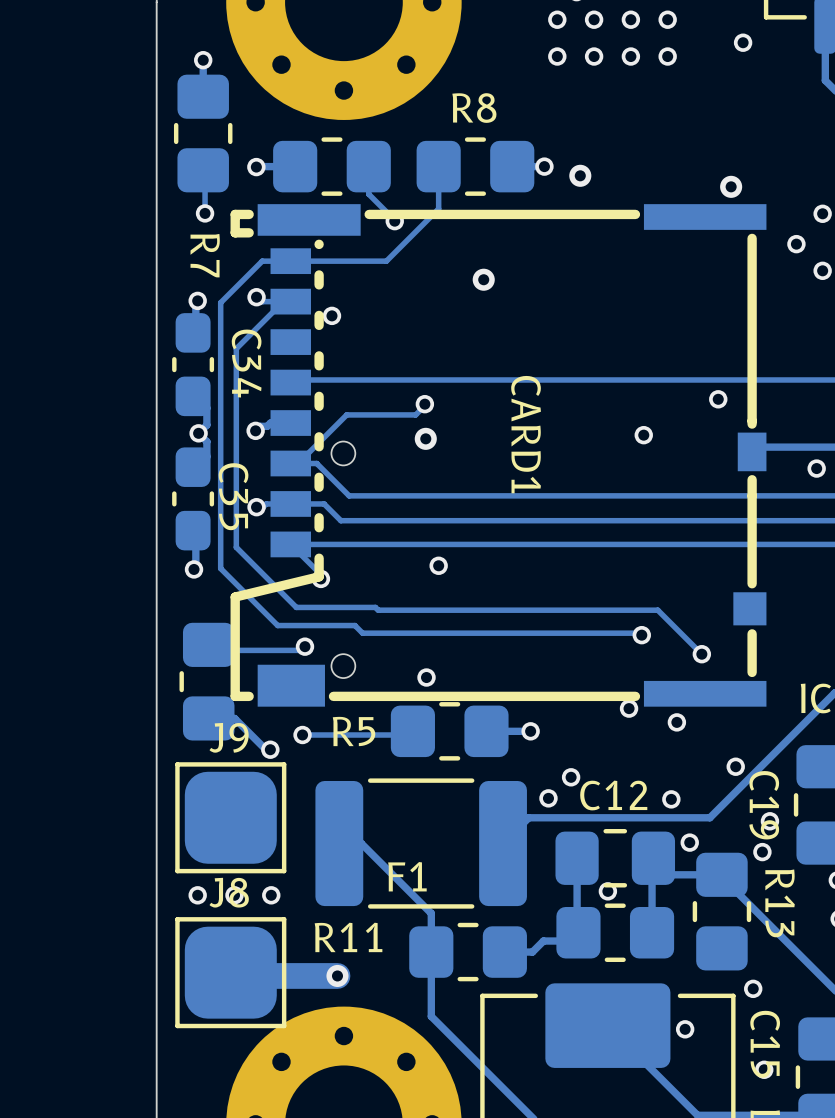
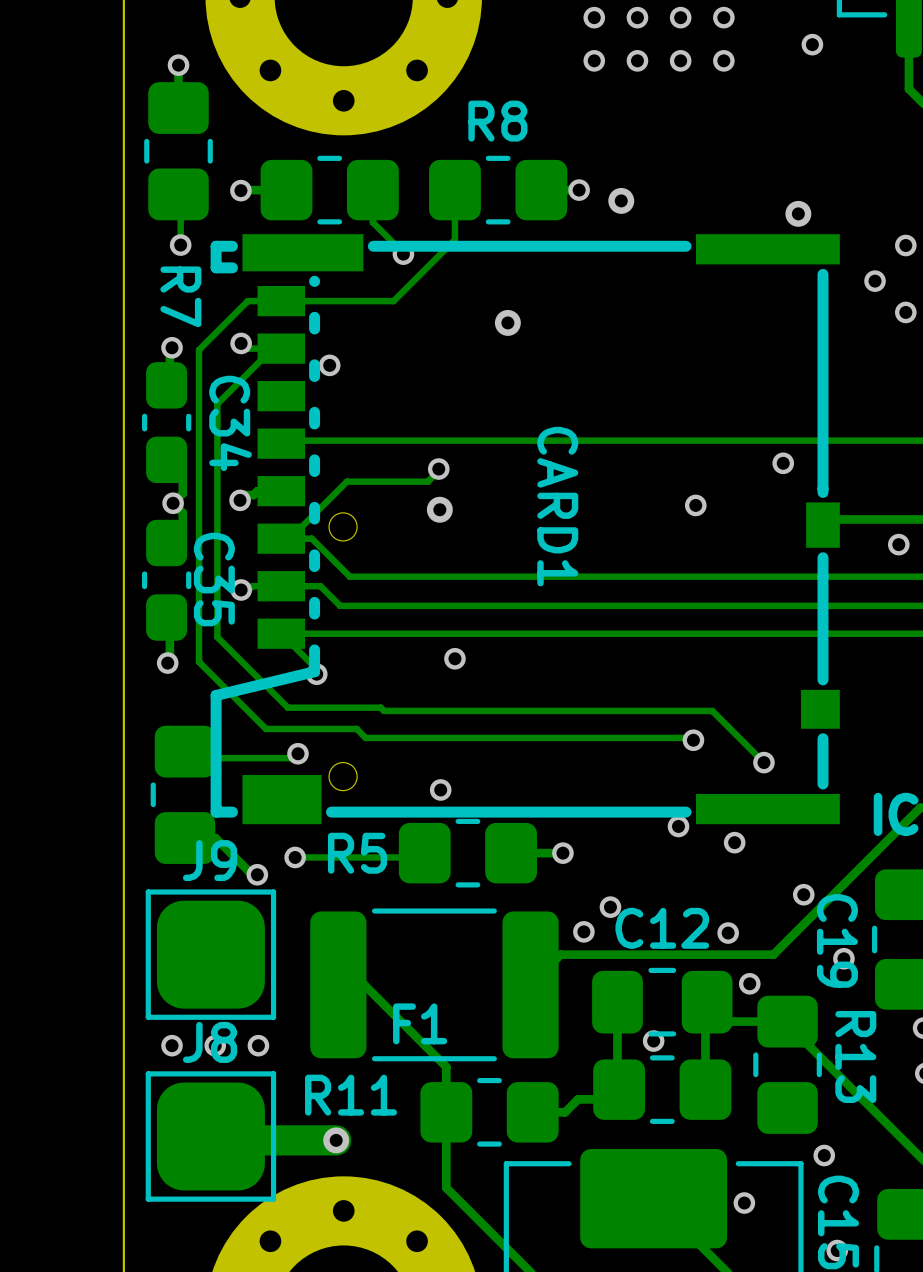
via: (762, 852) -> none

